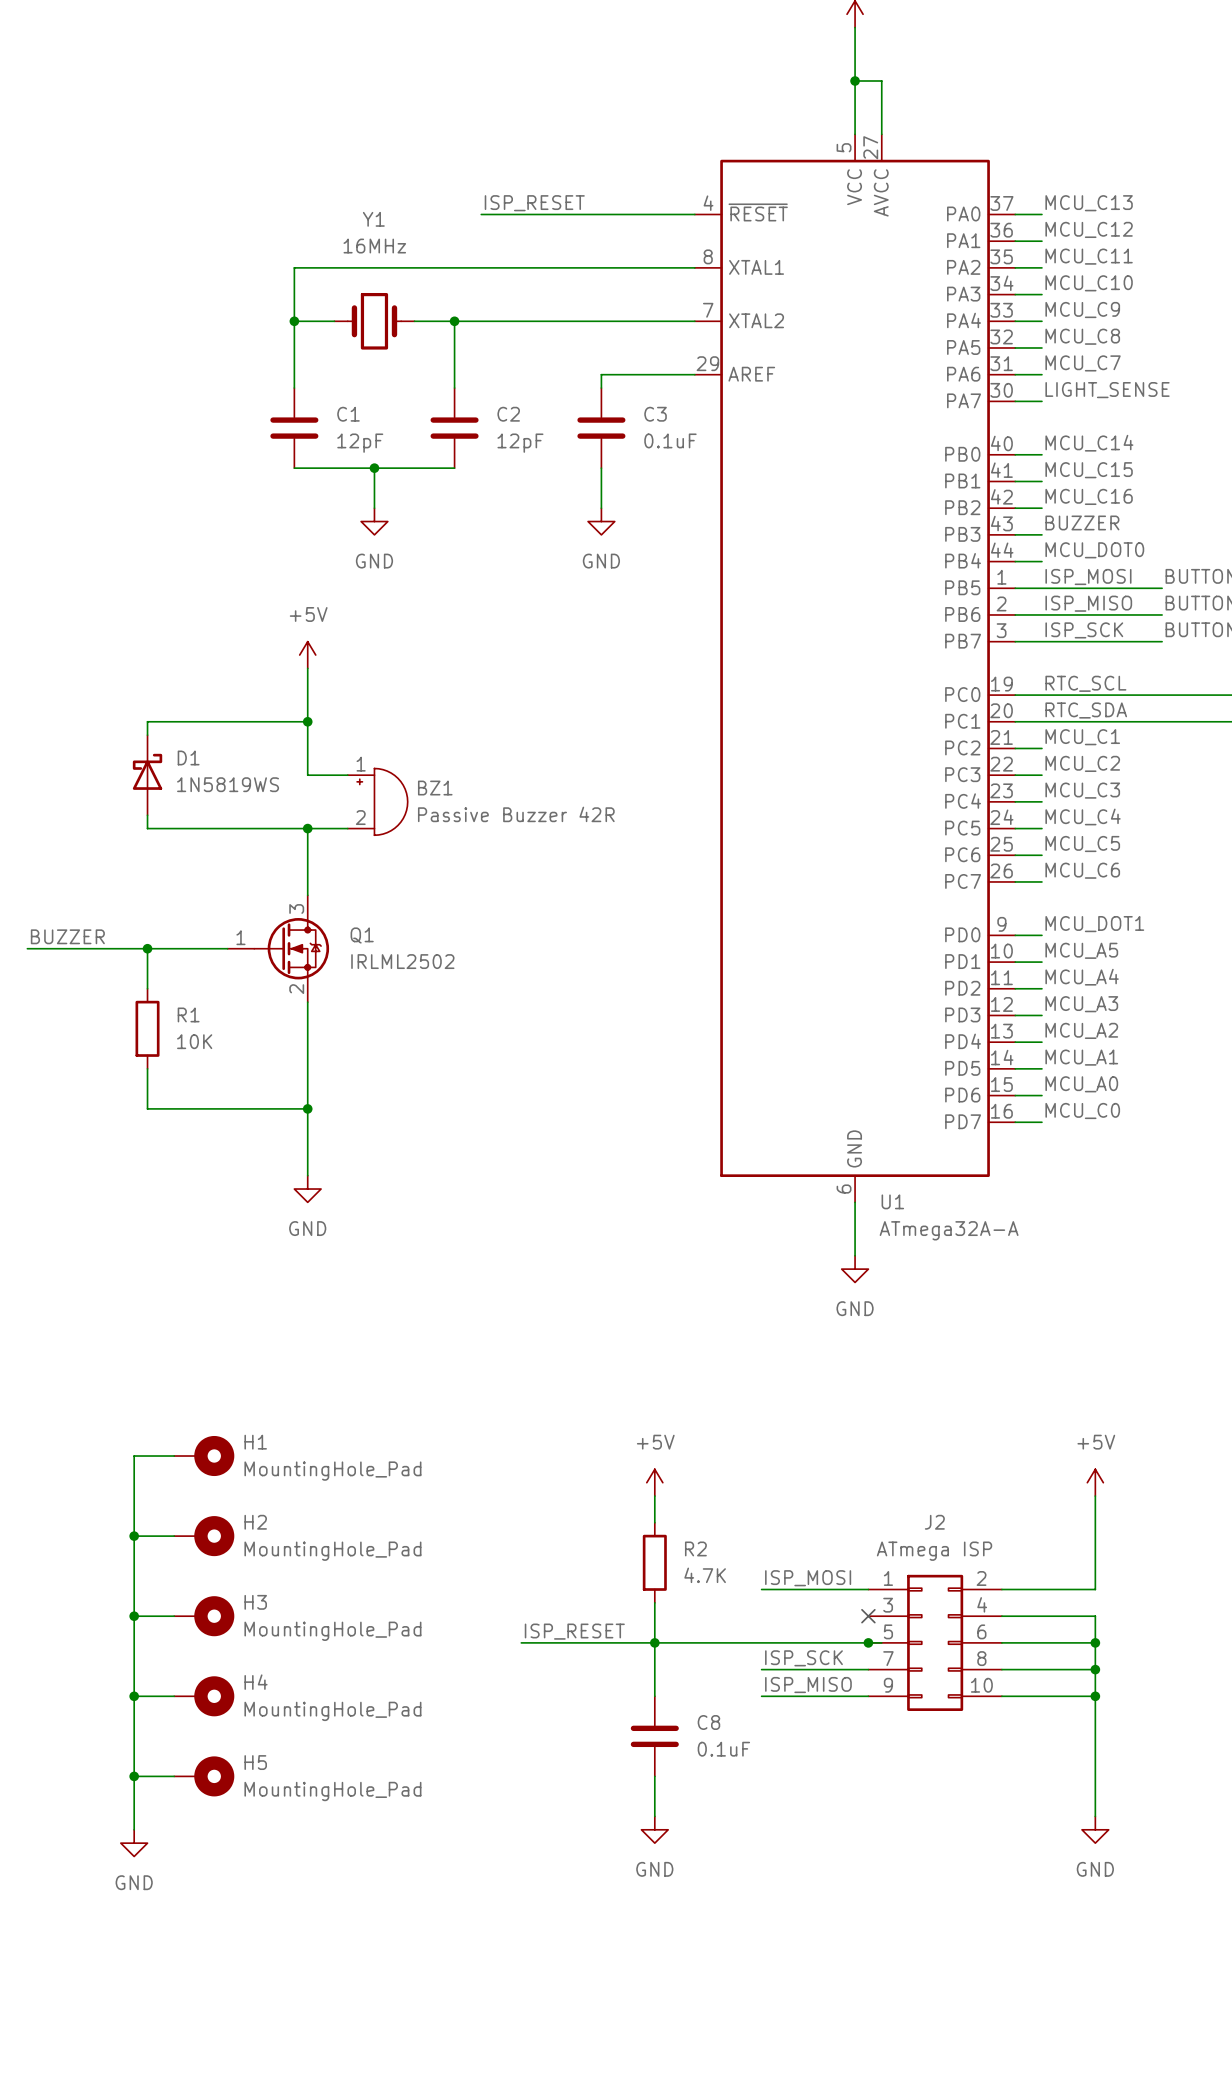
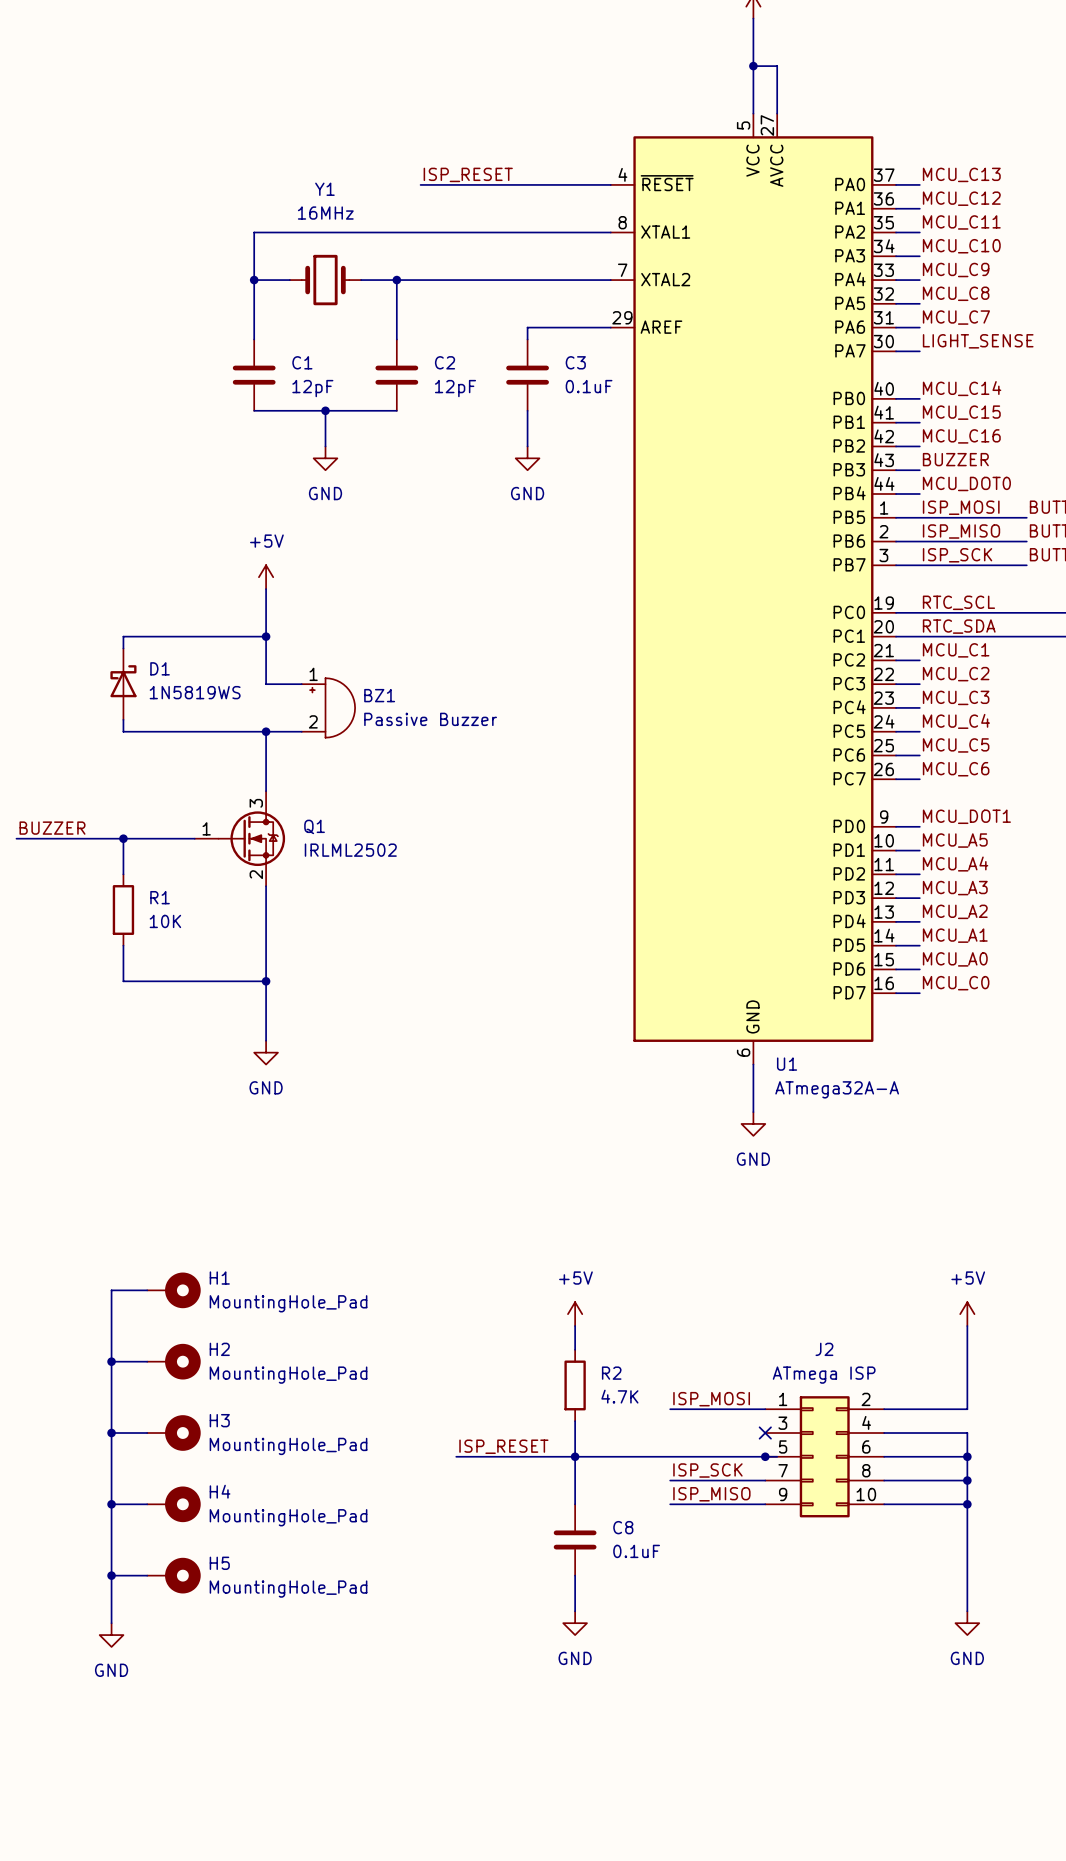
BZ1 value: Passive Buzzer 42R (516, 814) -> Passive Buzzer (430, 719)

